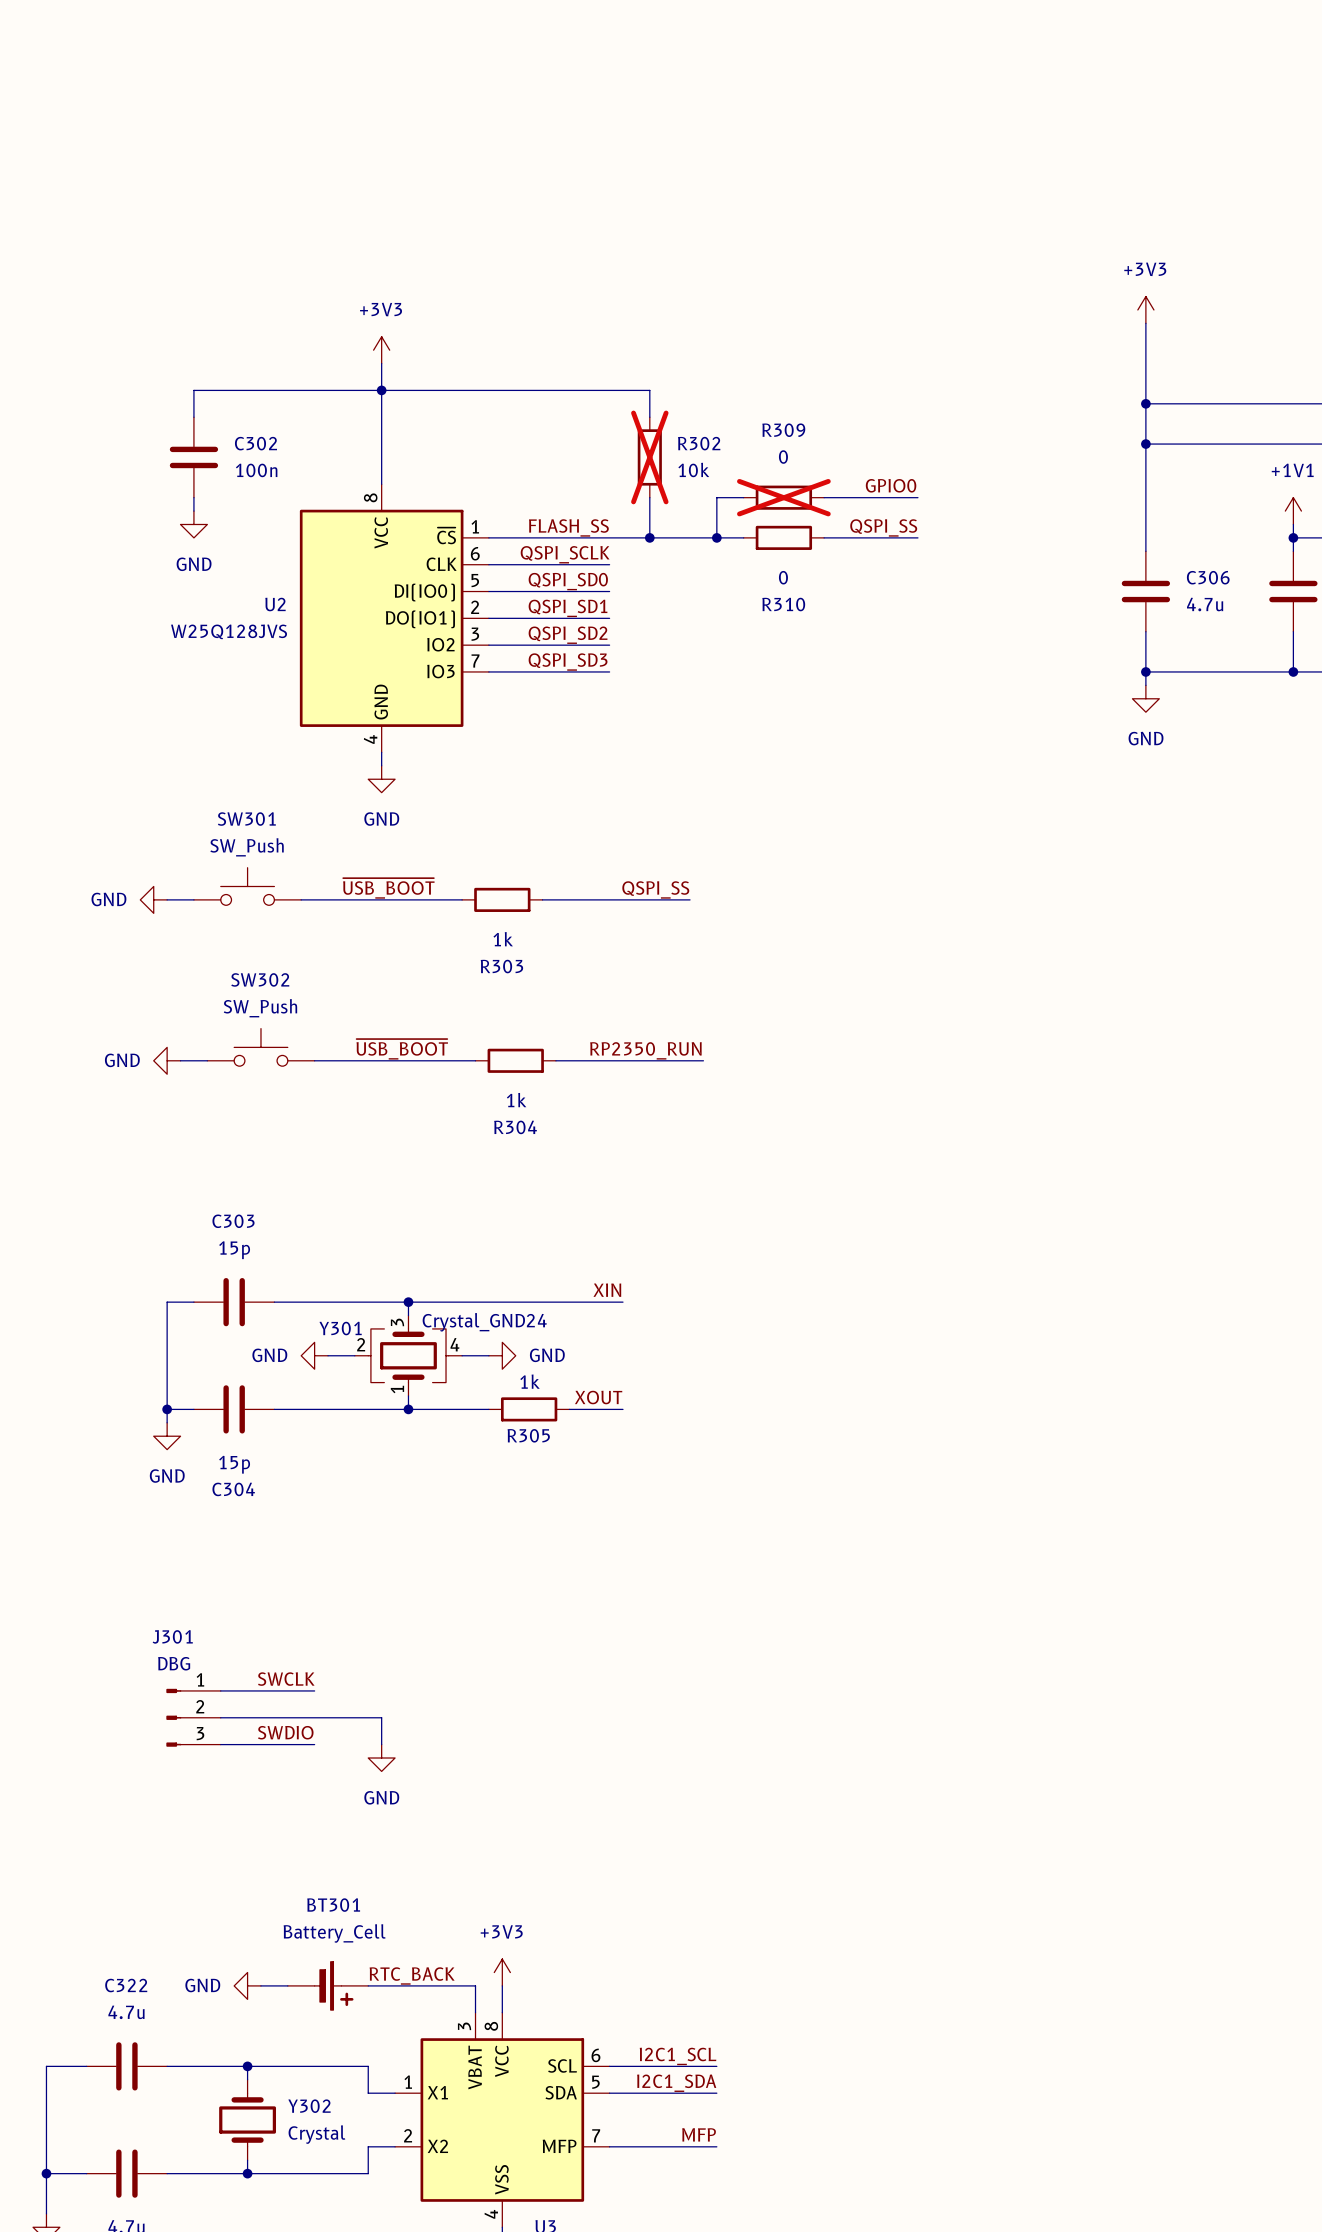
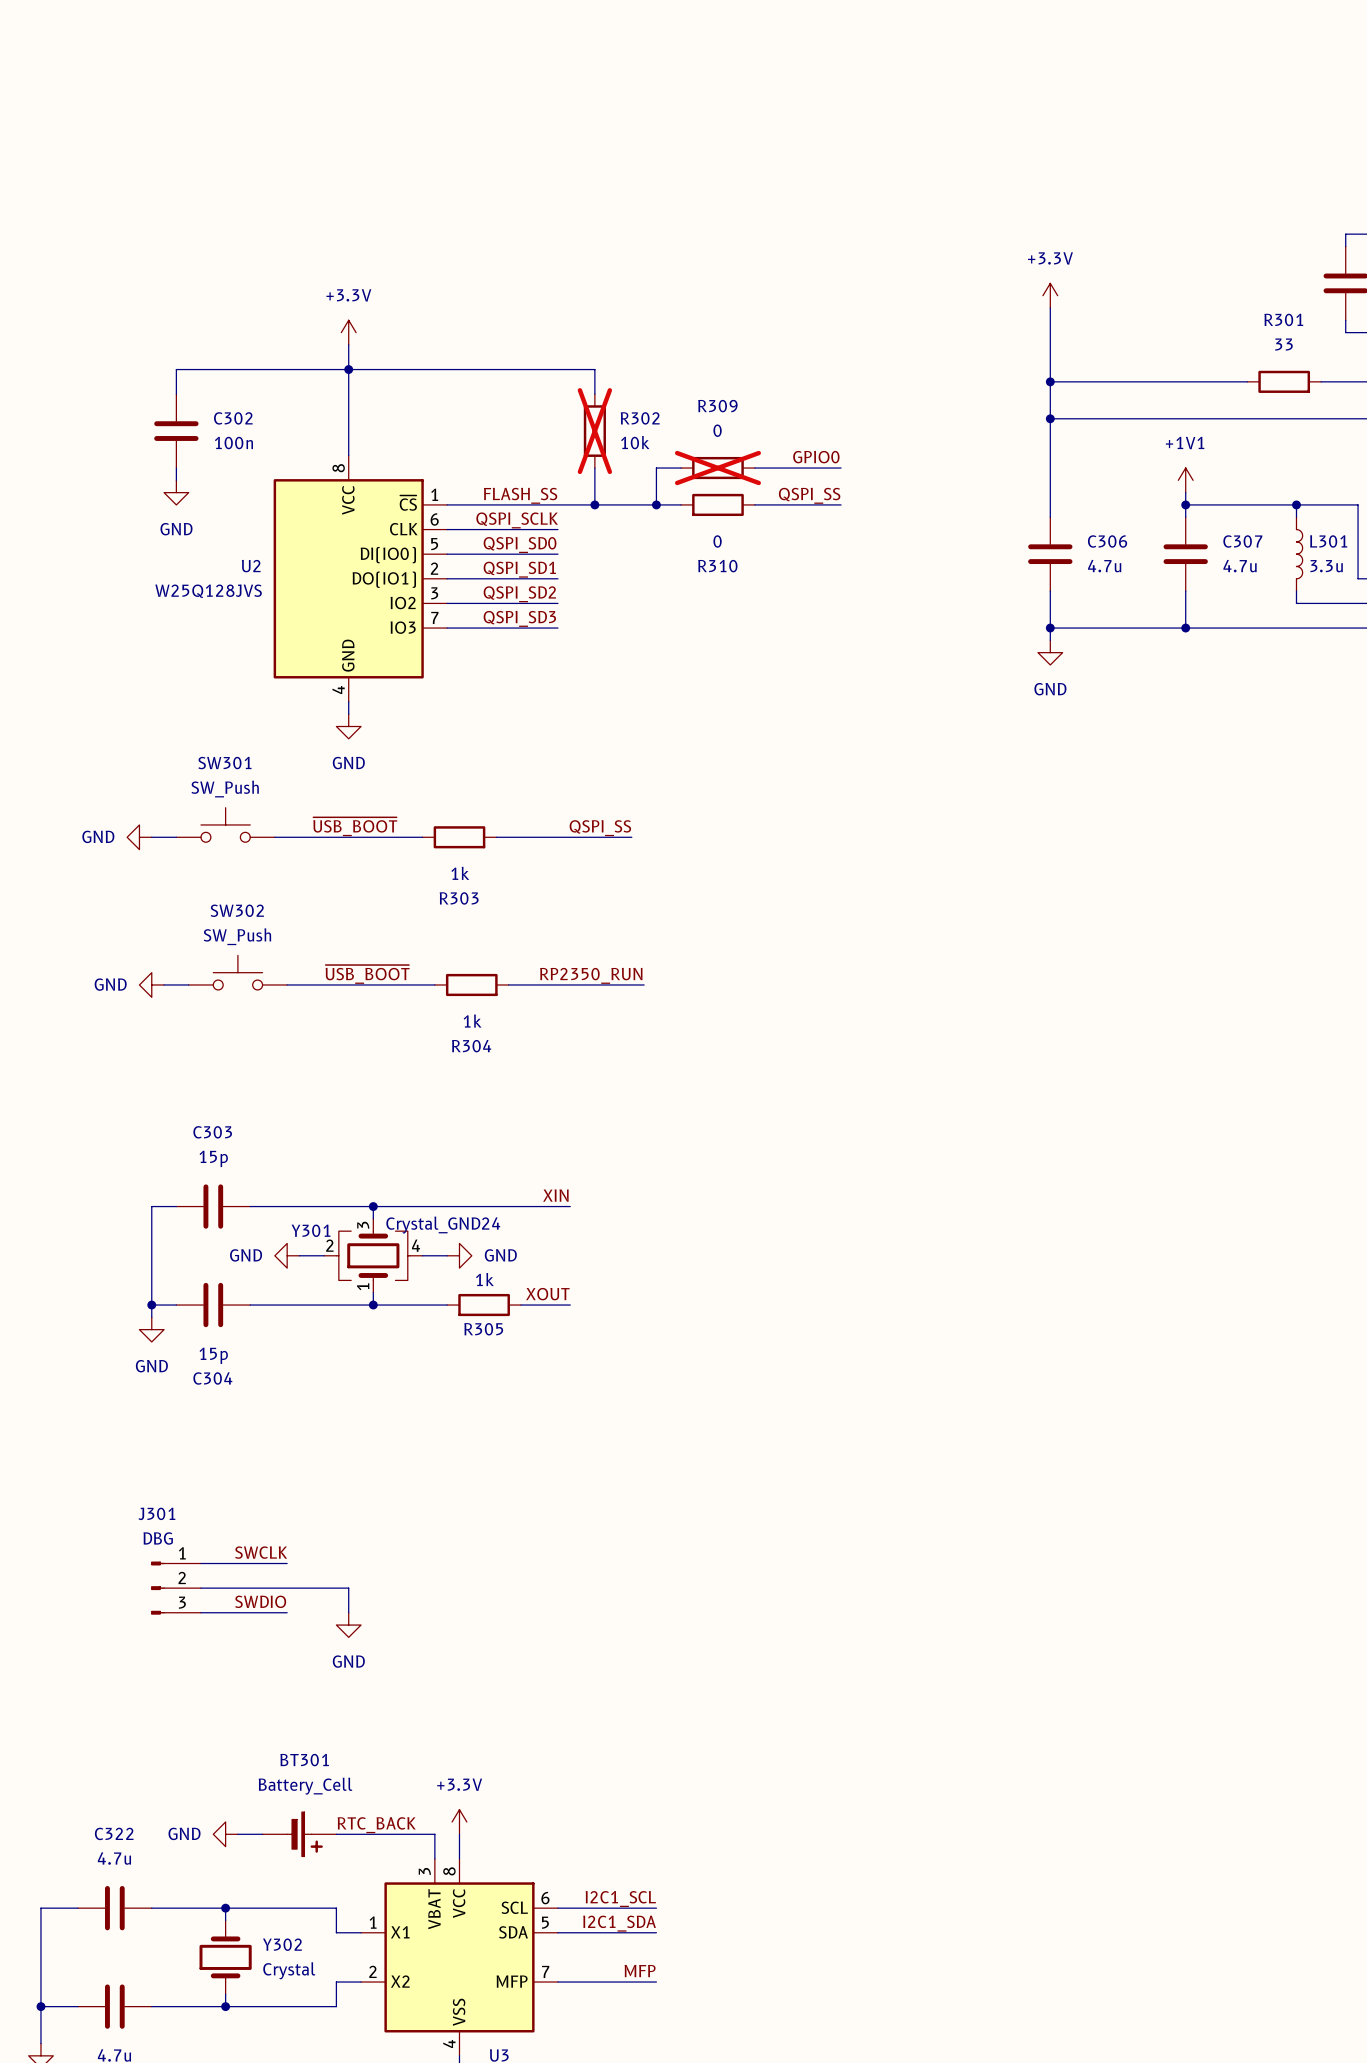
power symbol: +3V3 (1145, 309) -> +3.3V (1050, 295)
power symbol: +3V3 (381, 350) -> +3.3V (348, 332)
power symbol: +3V3 (502, 1972) -> +3.3V (459, 1821)

